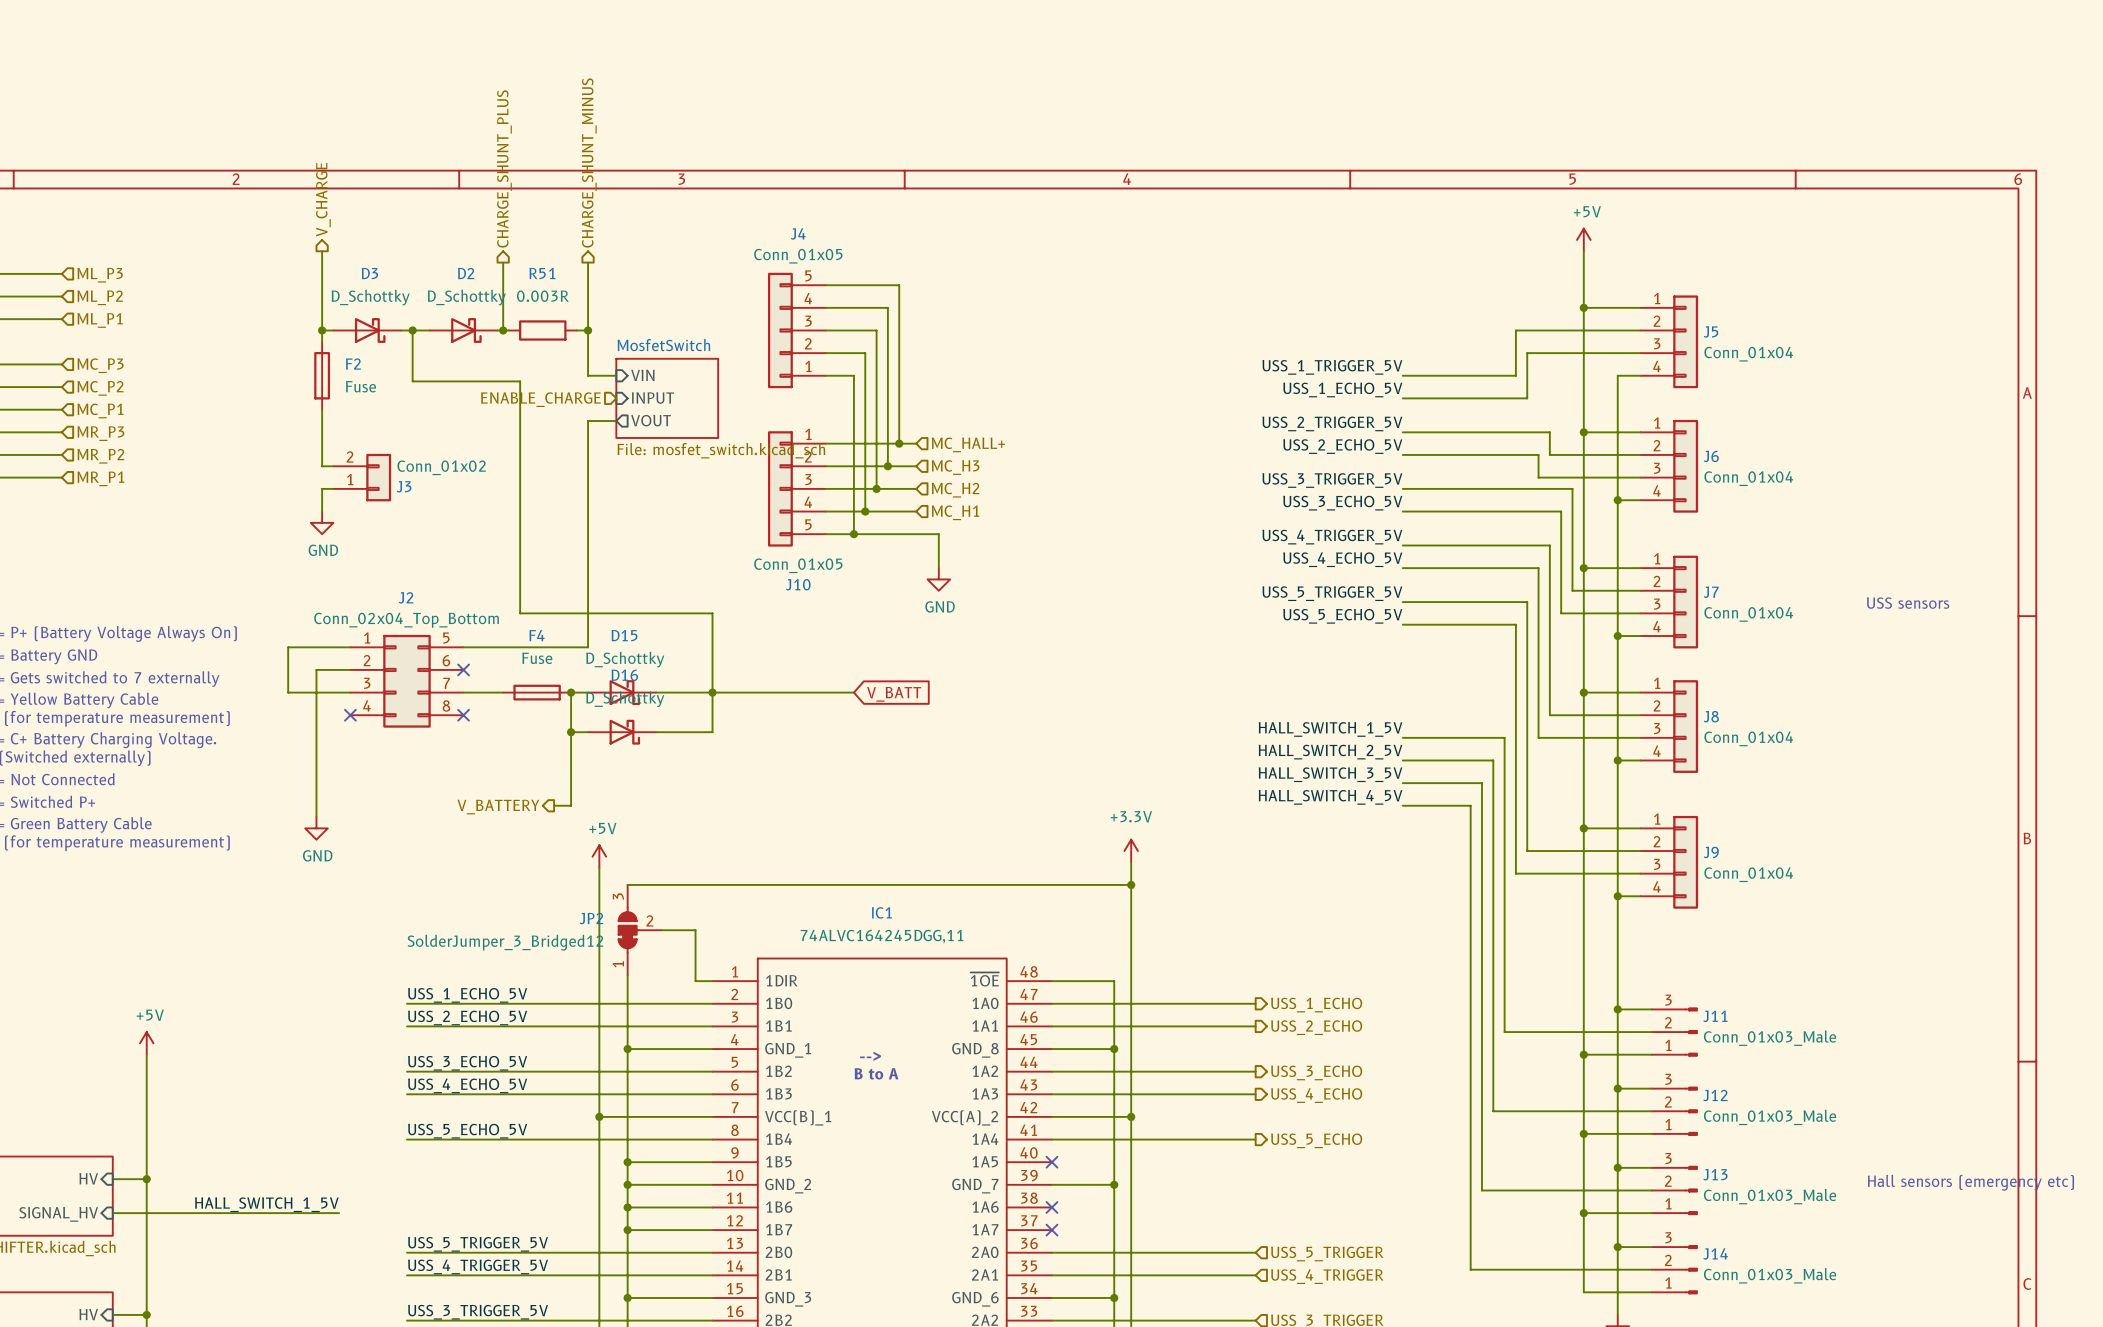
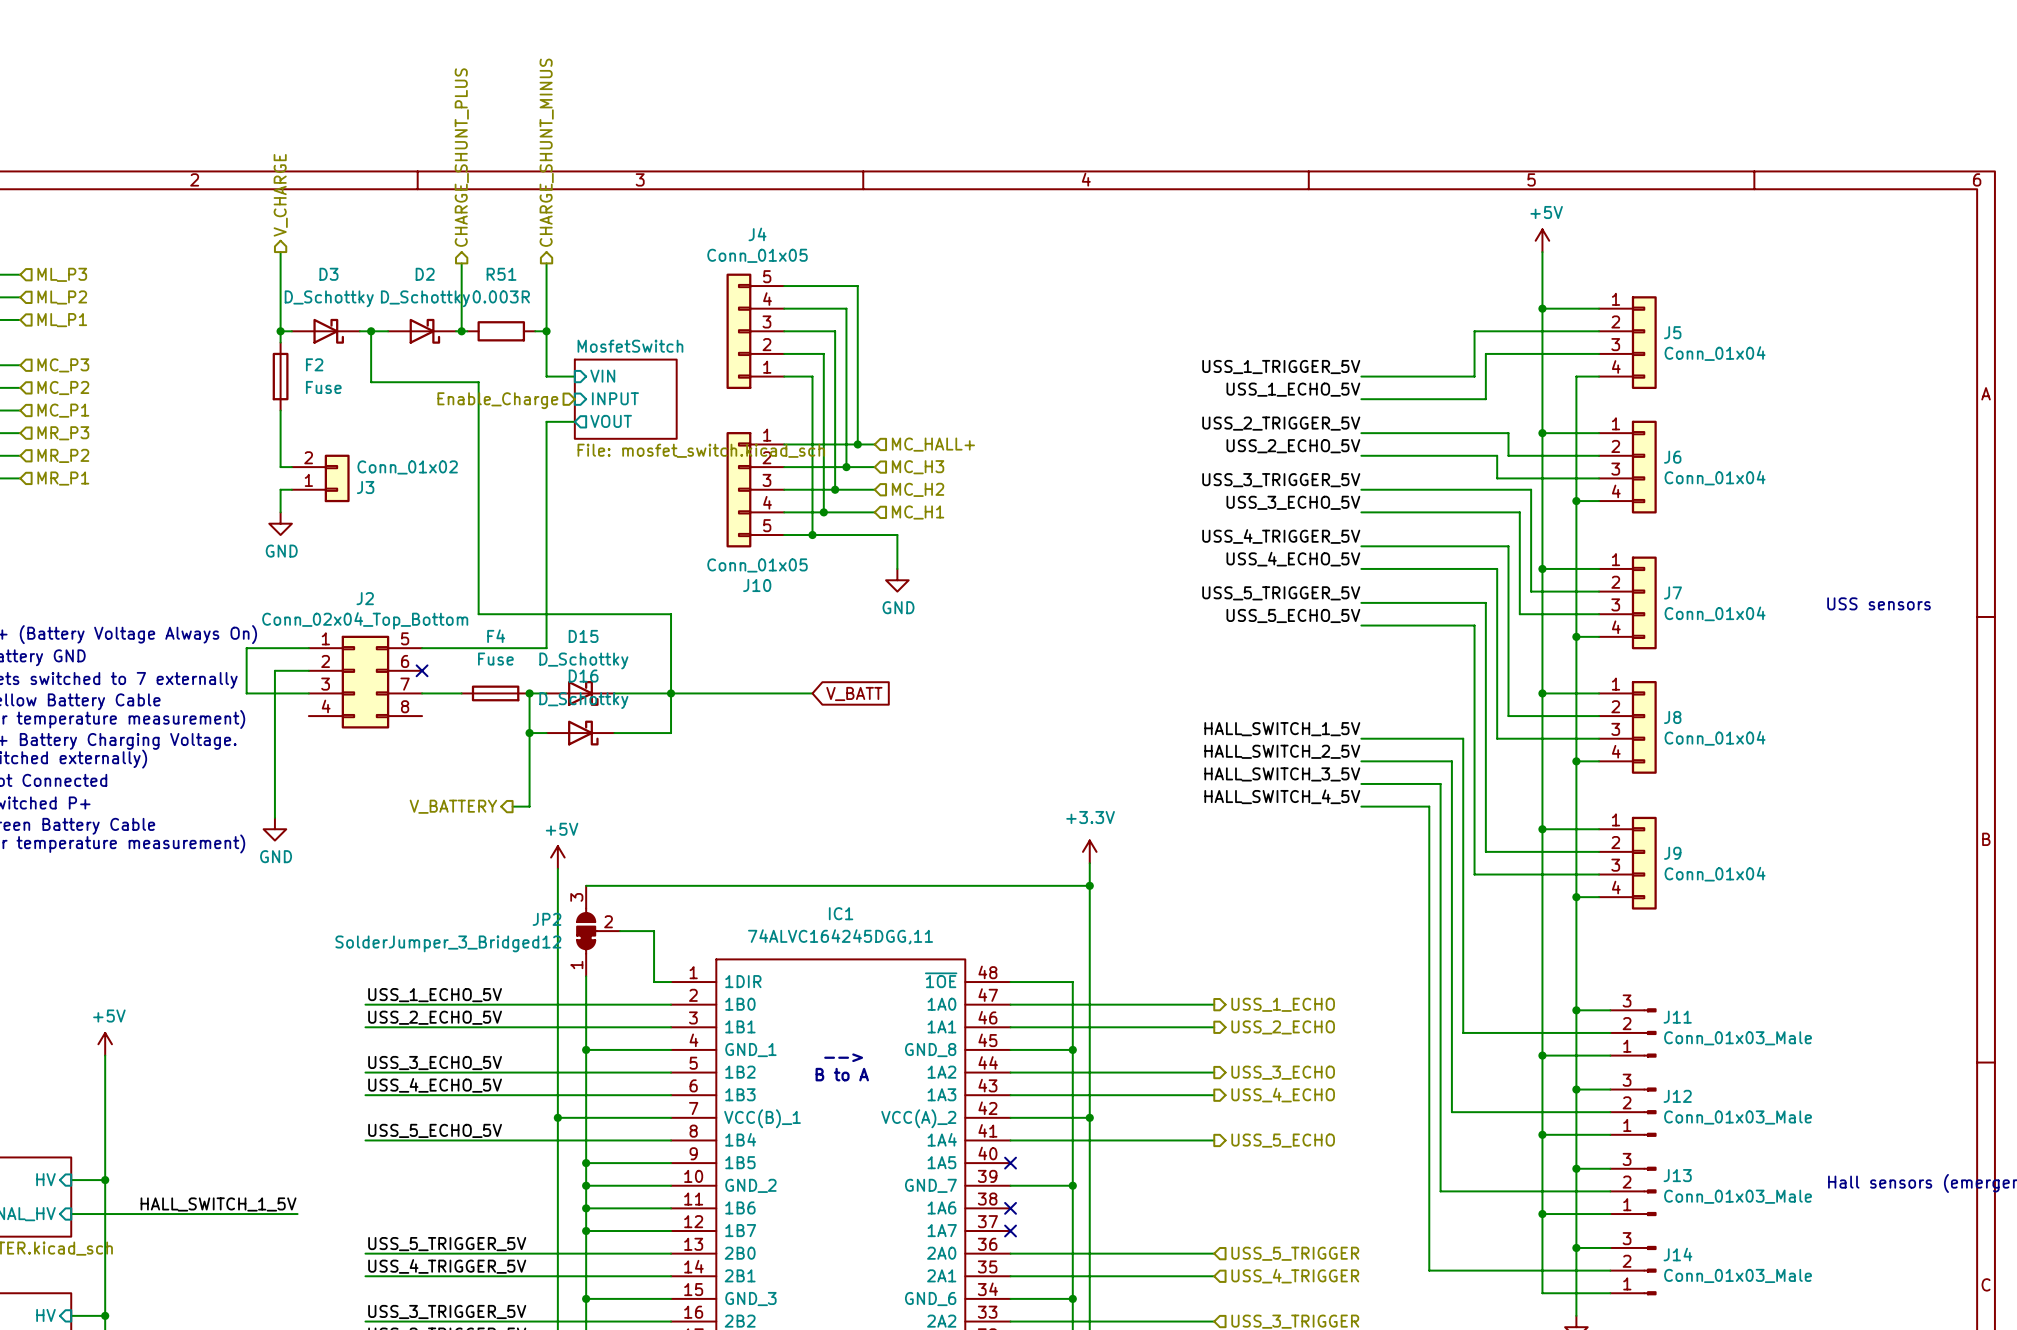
hierarchical label: ENABLE_CHARGE (540, 399) -> Enable_Charge (497, 400)
no-connect mark: (350, 715) -> none
no-connect mark: (463, 715) -> none

